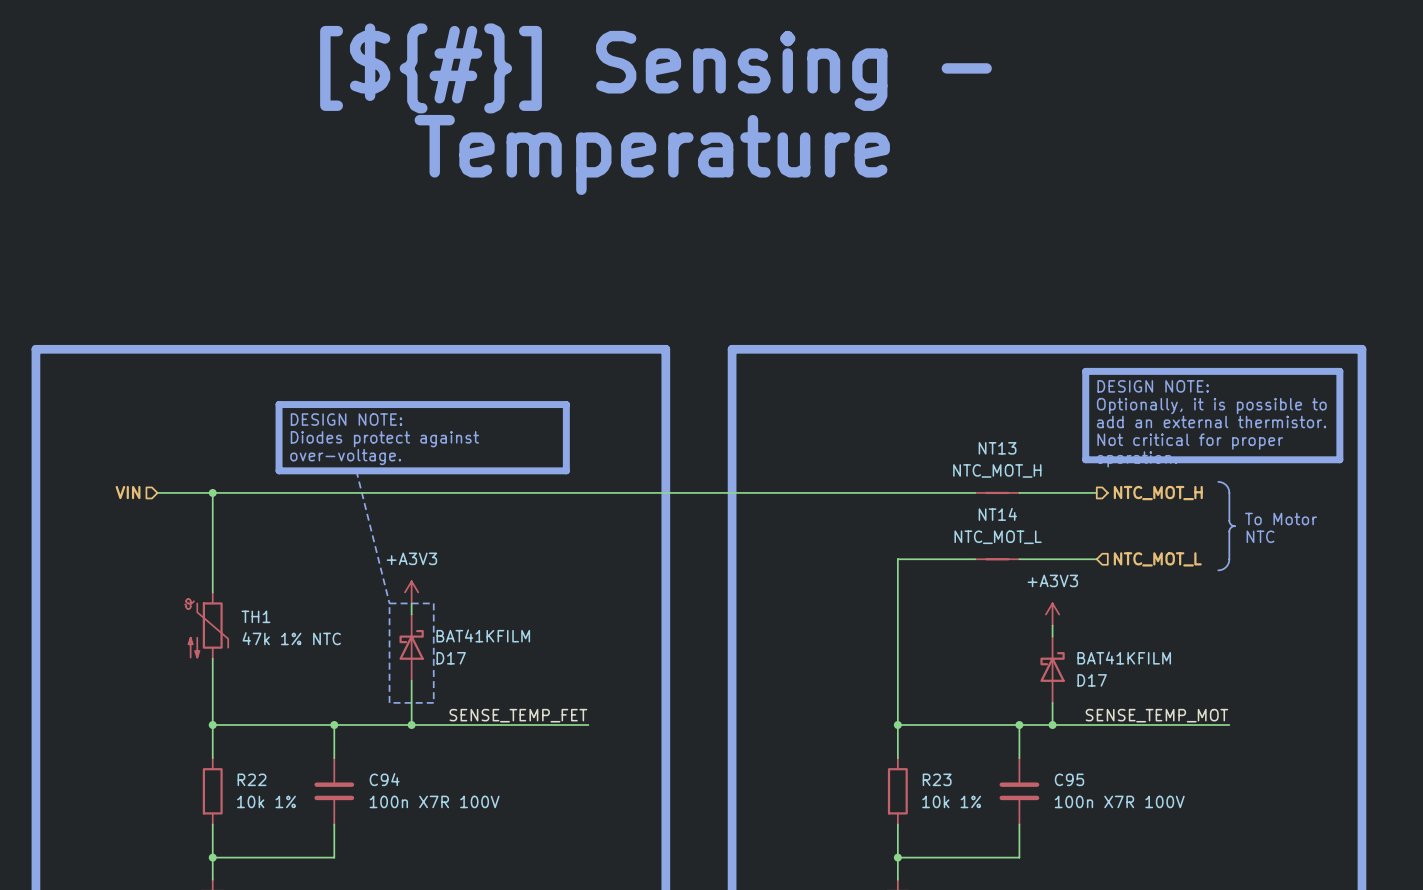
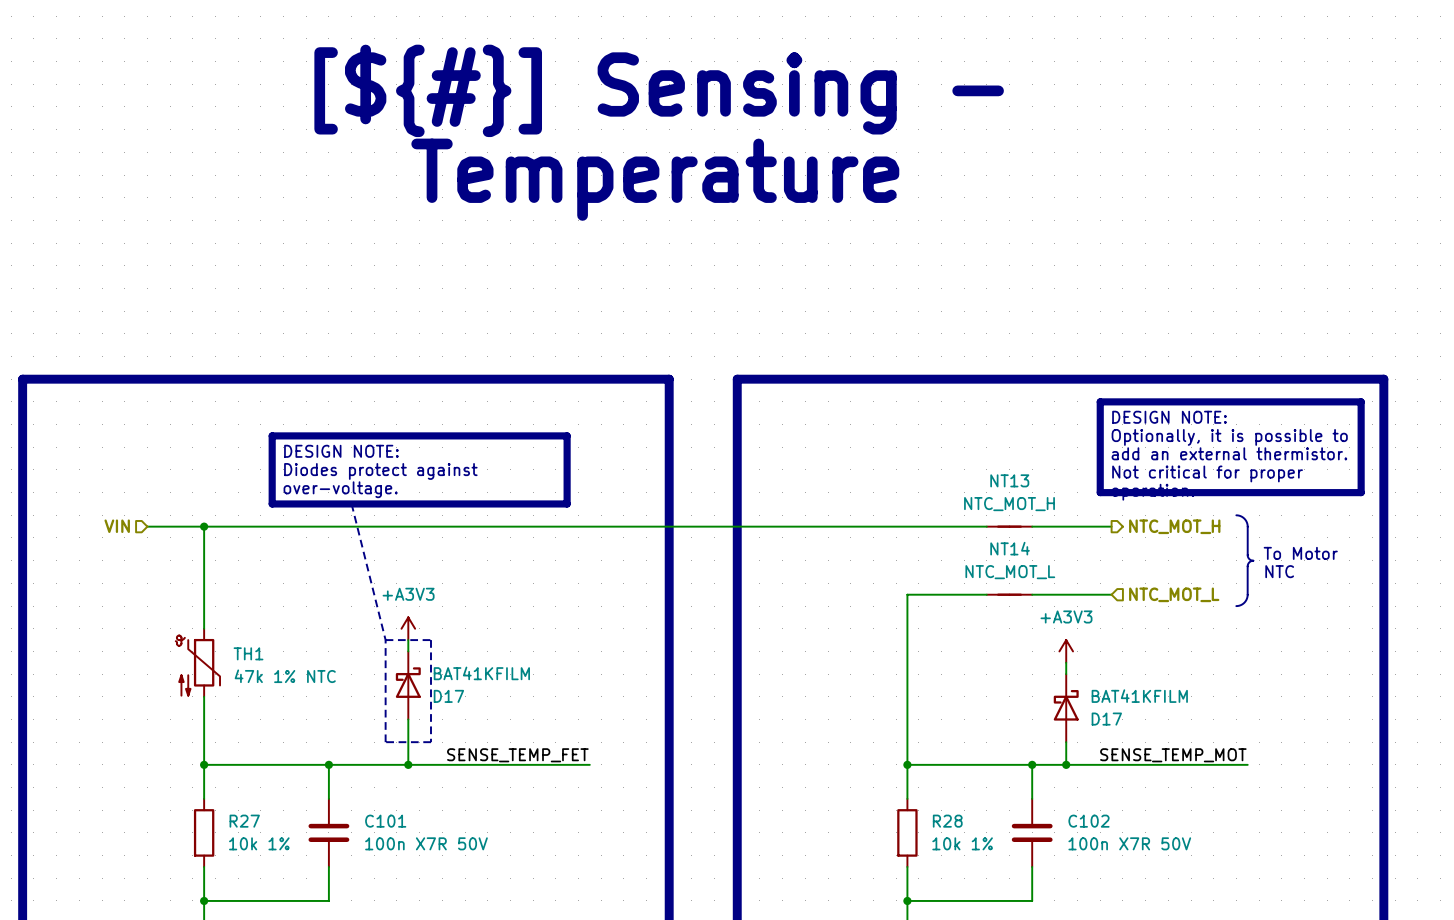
R22 name: R22 (252, 779) -> R27 (244, 821)
C94 name: C94 (384, 779) -> C101 (385, 821)
R23 name: R23 (937, 779) -> R28 (947, 821)
C95 name: C95 (1069, 779) -> C102 (1088, 821)
C94 value: 100n X7R 100V (434, 801) -> 100n X7R 50V (426, 843)
C95 value: 100n X7R 100V (1119, 801) -> 100n X7R 50V (1129, 843)

